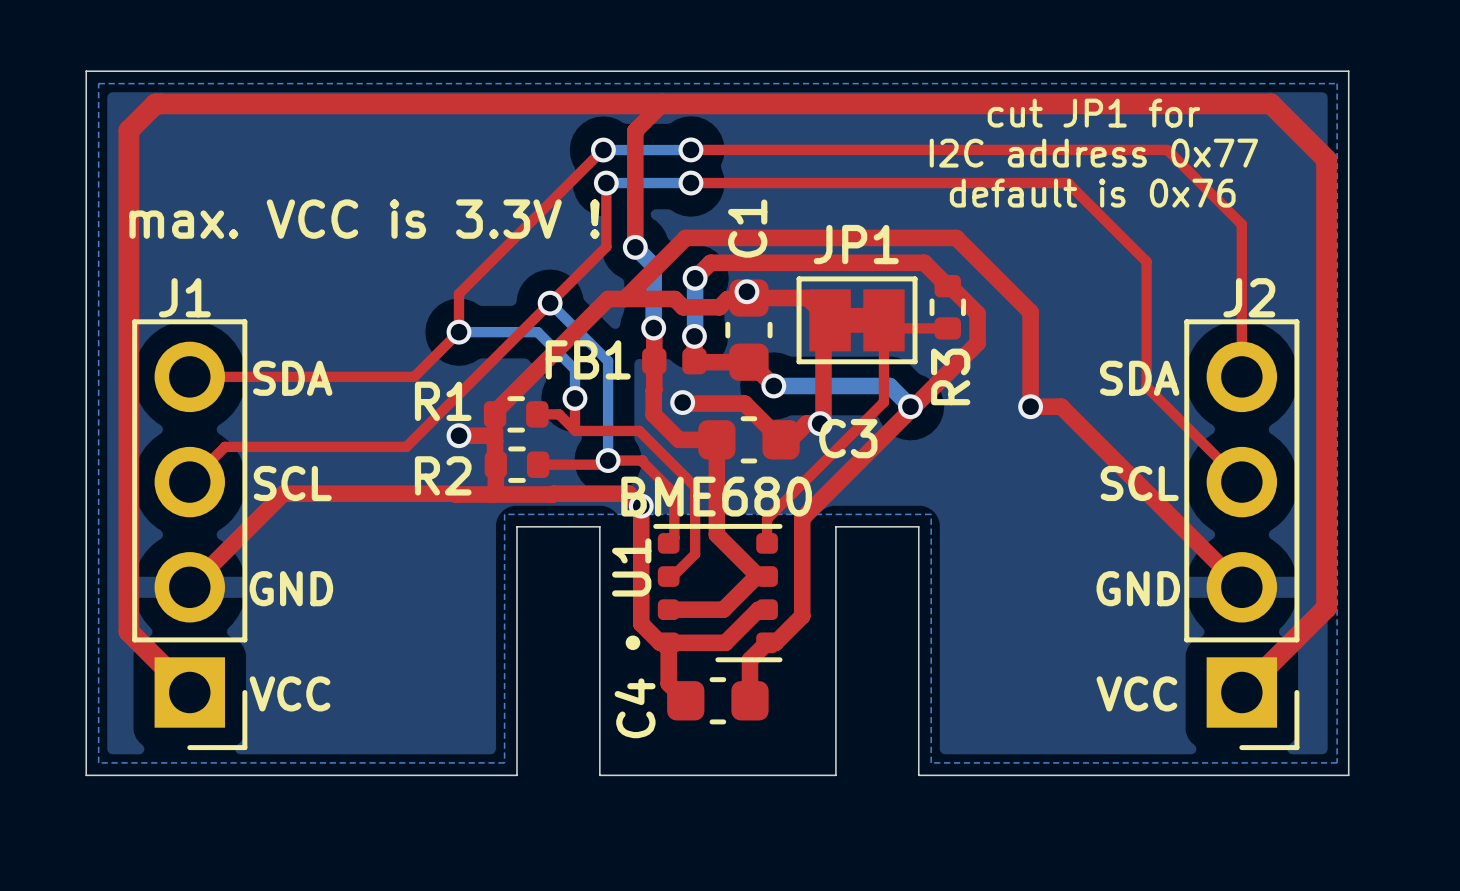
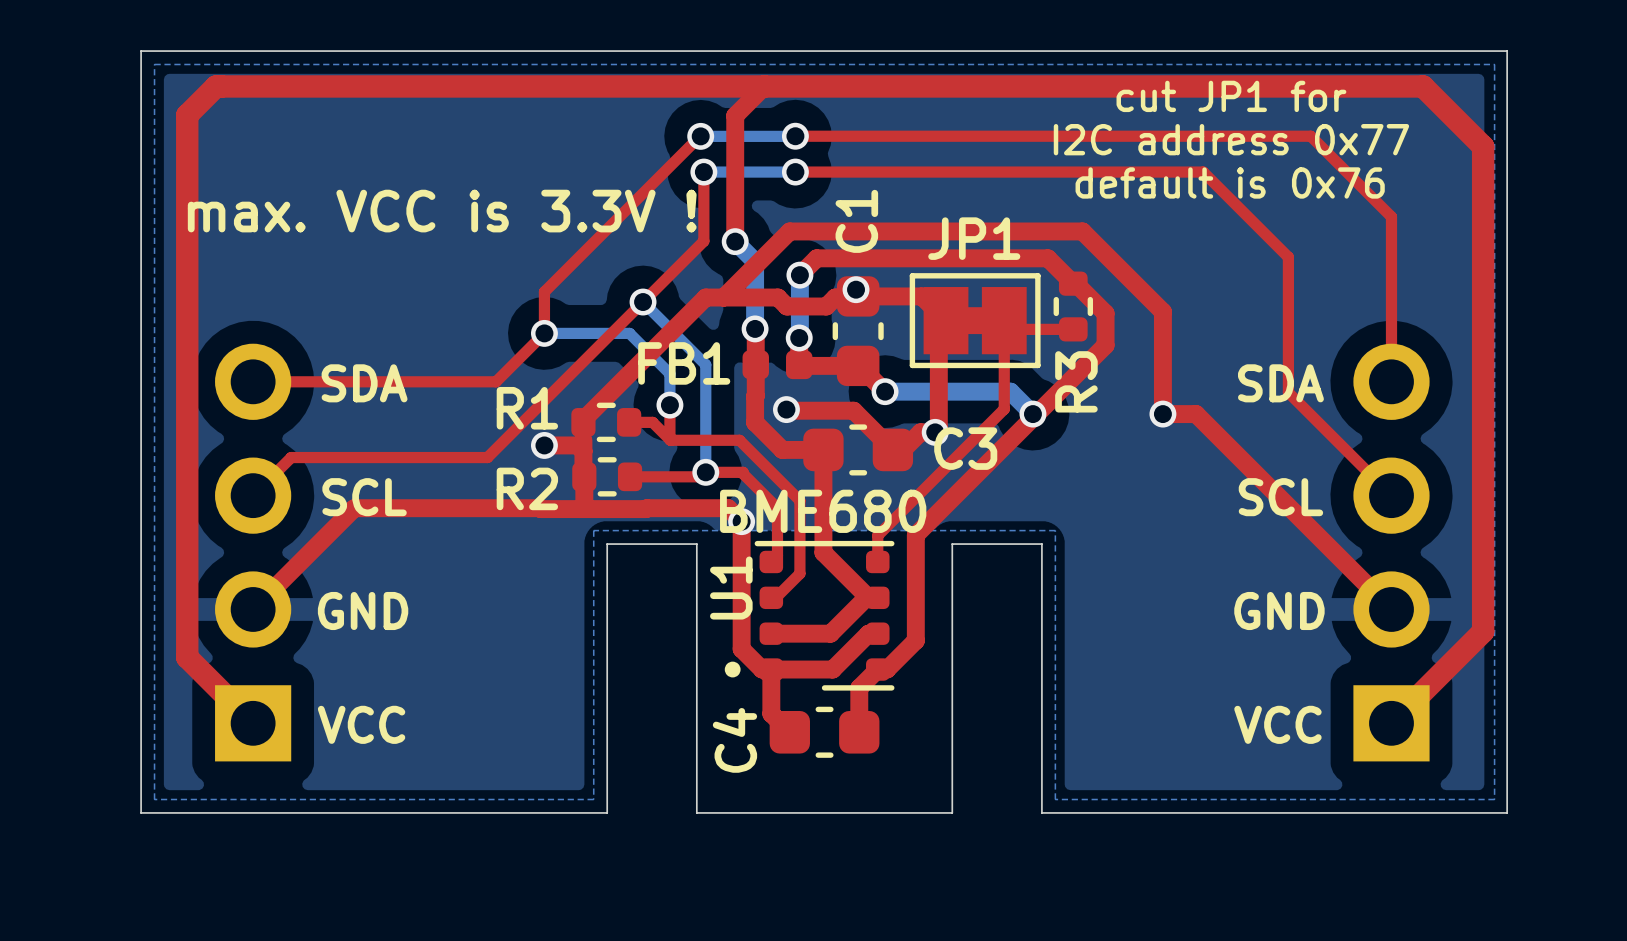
J1 side: top (189, 534) -> bottom (253, 552)
J2 side: top (1241, 534) -> bottom (1391, 552)

